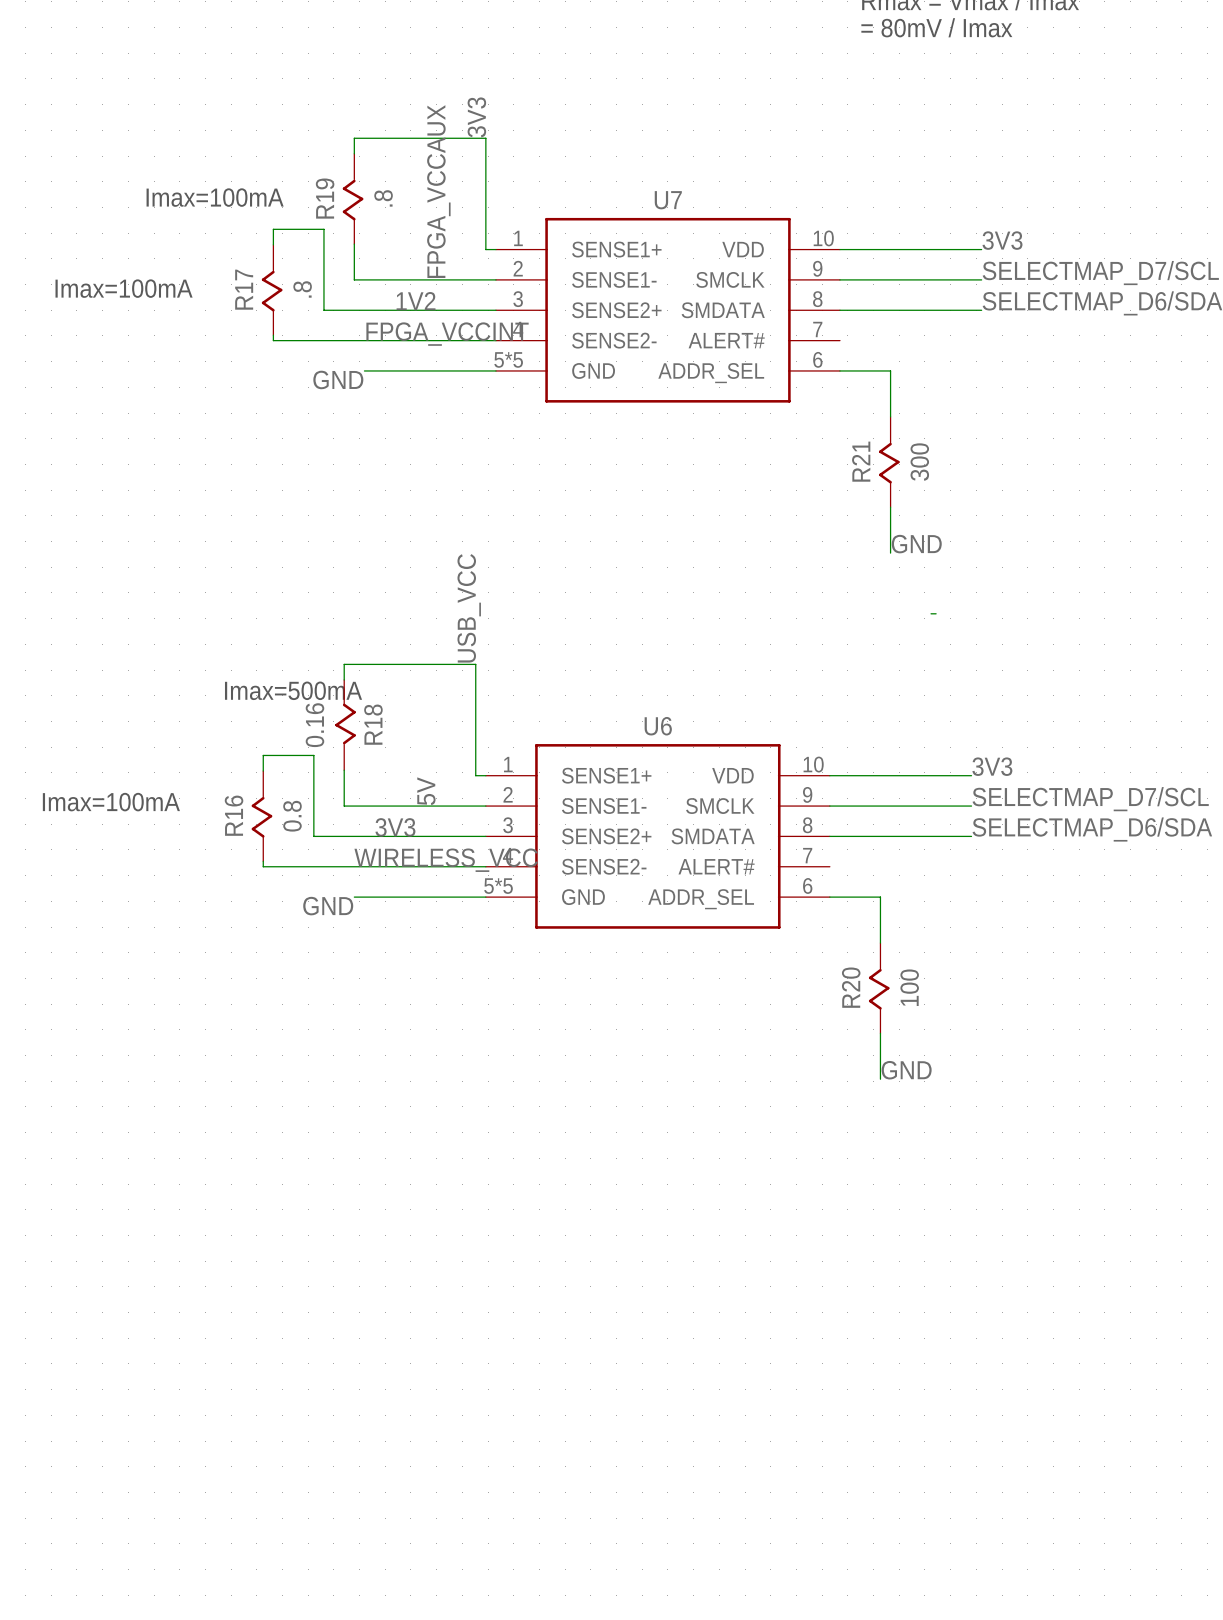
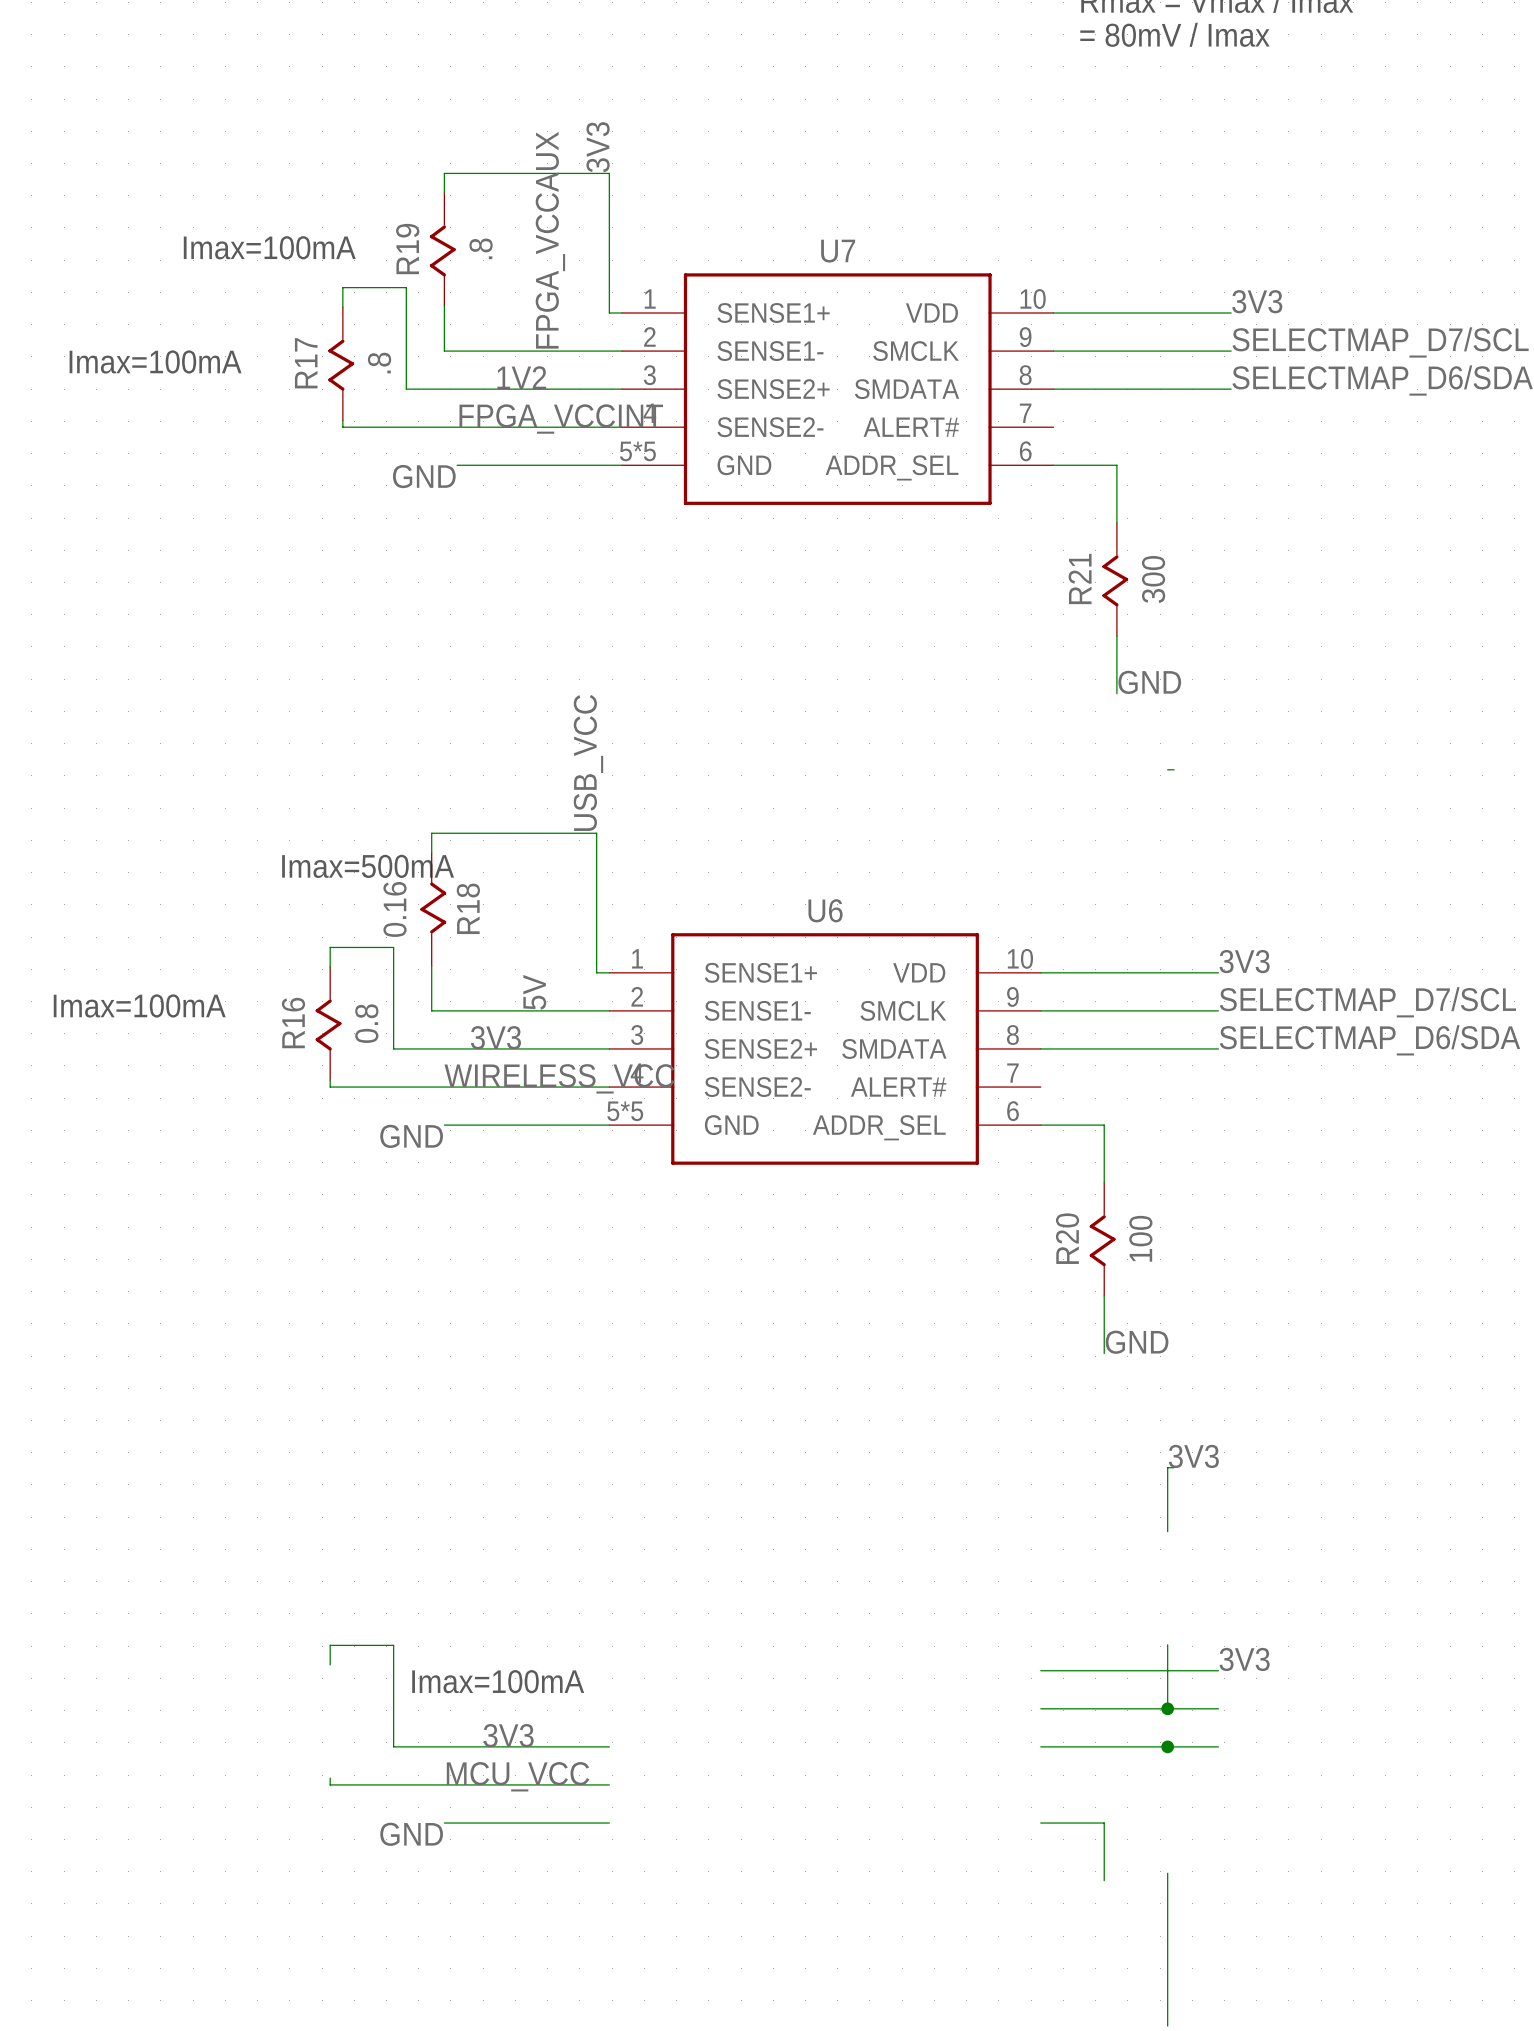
label: none -> 3V3 (1193, 1456)
wire: none -> (1174, 1467) (1167, 1467) (1167, 1531)
wire: none -> (1167, 1644) (1167, 1708)
label: none -> 3V3 (1244, 1659)
wire: none -> (330, 1664) (330, 1645) (393, 1645) (393, 1746) (609, 1746)
wire: none -> (1040, 1670) (1218, 1670)
text: none -> Imax=100mA (498, 1681)
wire: none -> (1040, 1708) (1218, 1708)
junction: none -> (1167, 1708)
label: none -> 3V3 (508, 1735)
wire: none -> (1040, 1746) (1218, 1746)
junction: none -> (1167, 1746)
label: none -> MCU_VCC (518, 1776)
wire: none -> (330, 1778) (330, 1784) (609, 1784)
wire: none -> (444, 1823) (609, 1823)
wire: none -> (1040, 1823) (1104, 1823) (1104, 1880)
label: none -> GND (411, 1834)
wire: none -> (1167, 1873) (1167, 2026)

